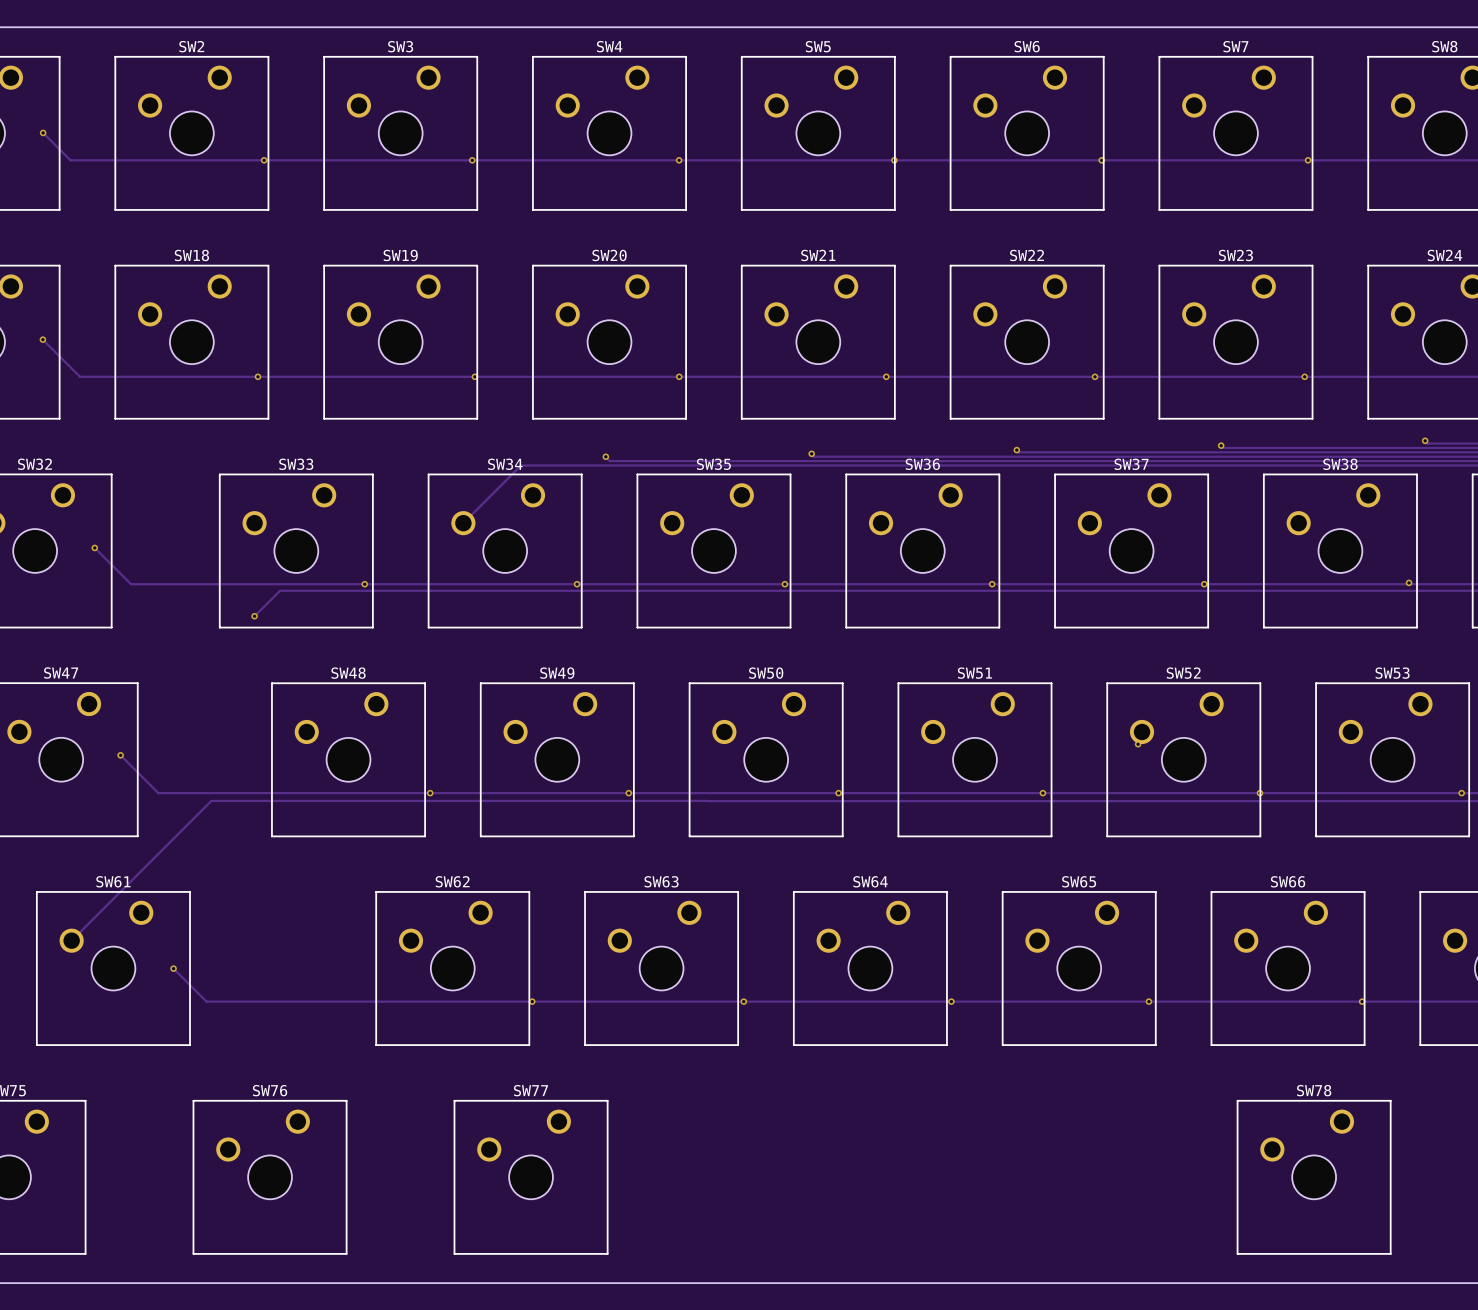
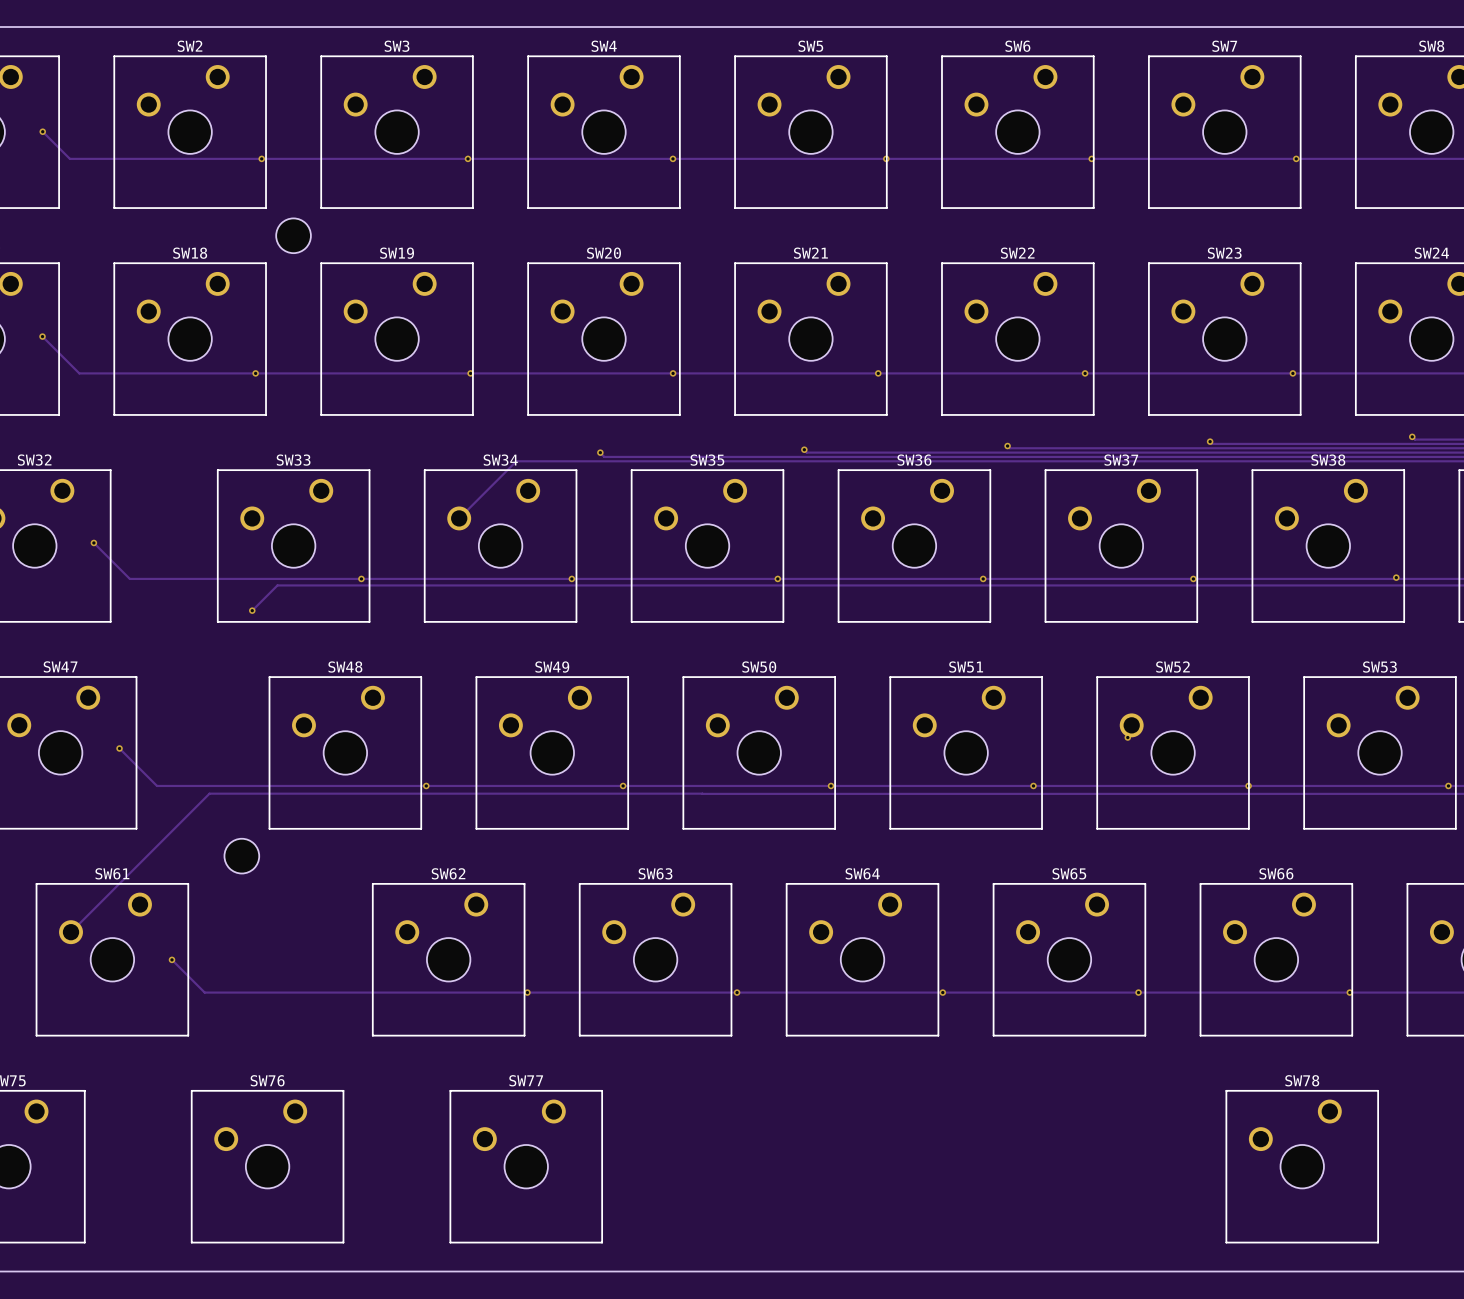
part: none -> (293, 235)
part: none -> (241, 856)

